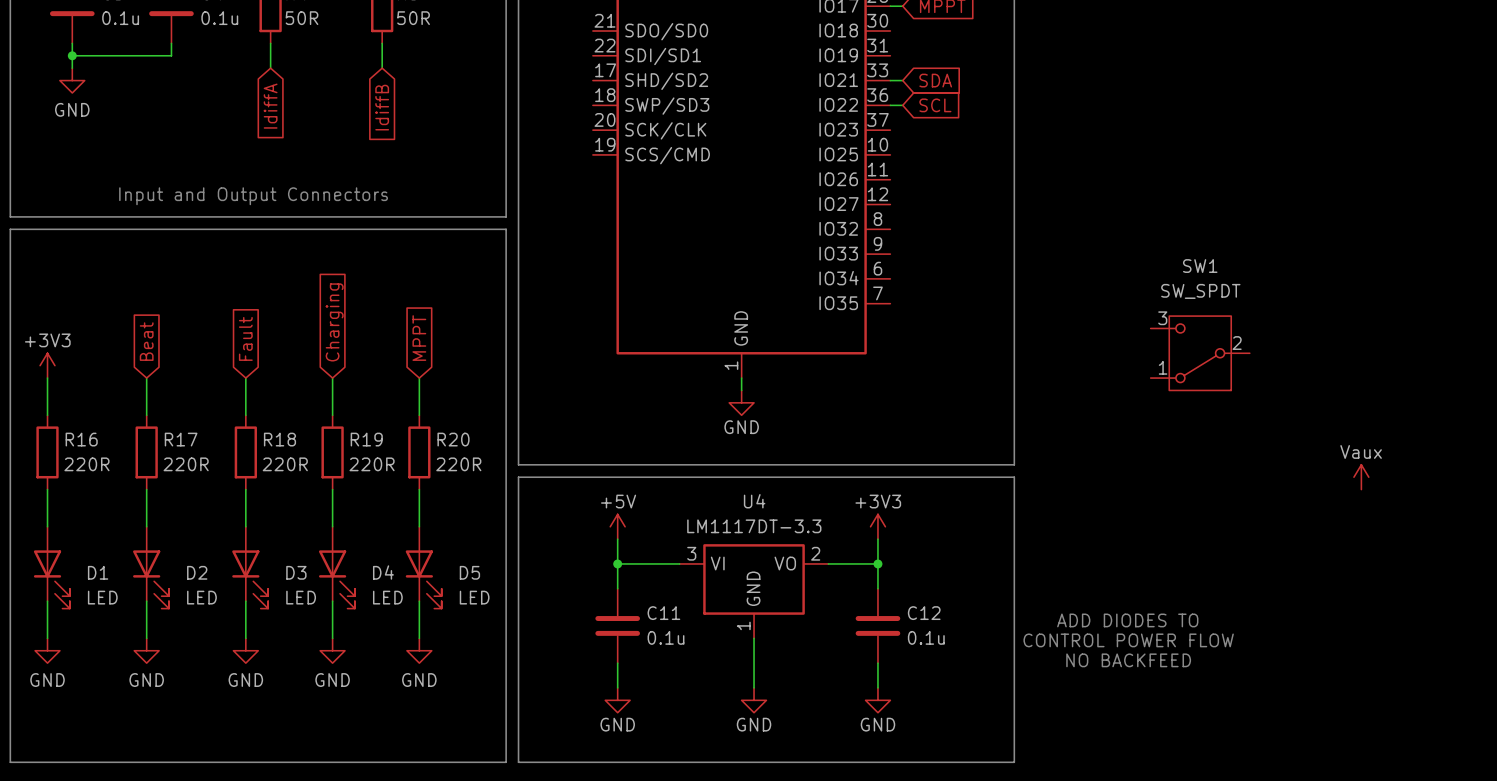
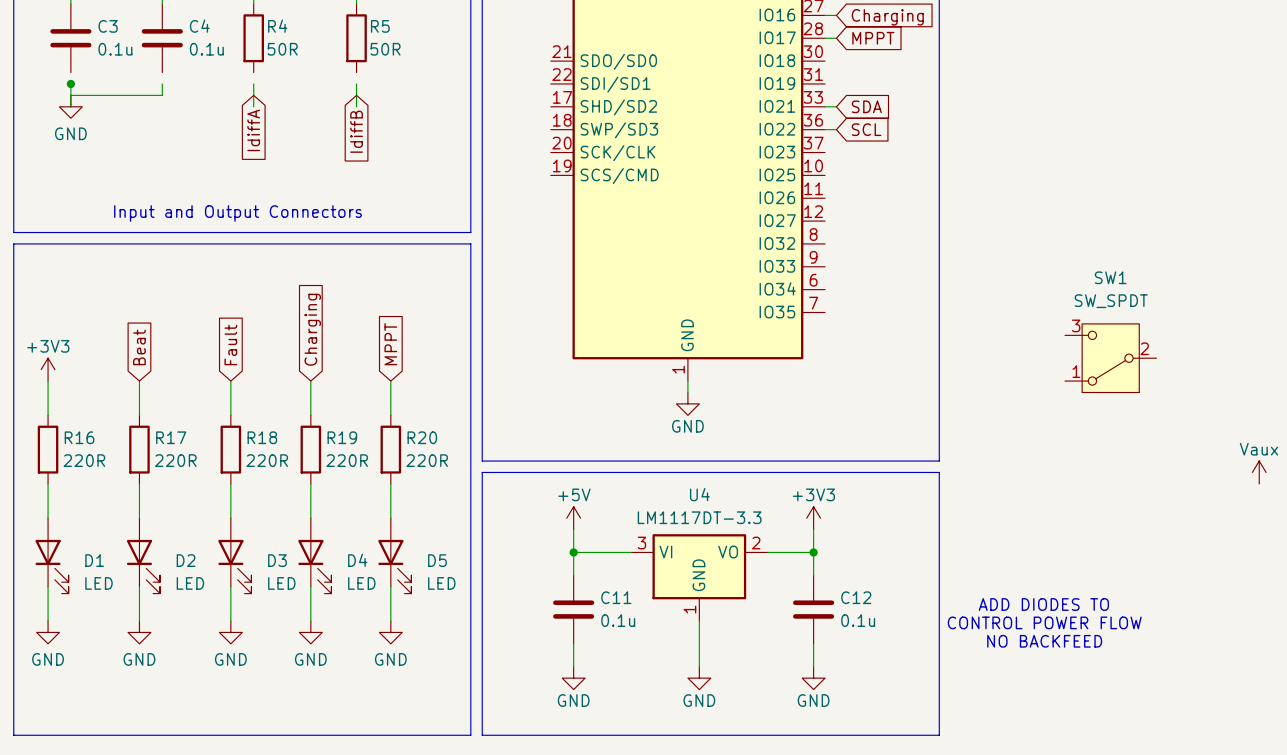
wire: (72, 43) (72, 55) (171, 55) (171, 43) -> none
wire: (270, 43) (270, 55) -> (253, 95) (253, 106)
wire: (382, 43) (382, 55) -> (356, 95) (356, 106)
wire: none -> (162, 83) (162, 95) (70, 95) (70, 106)

